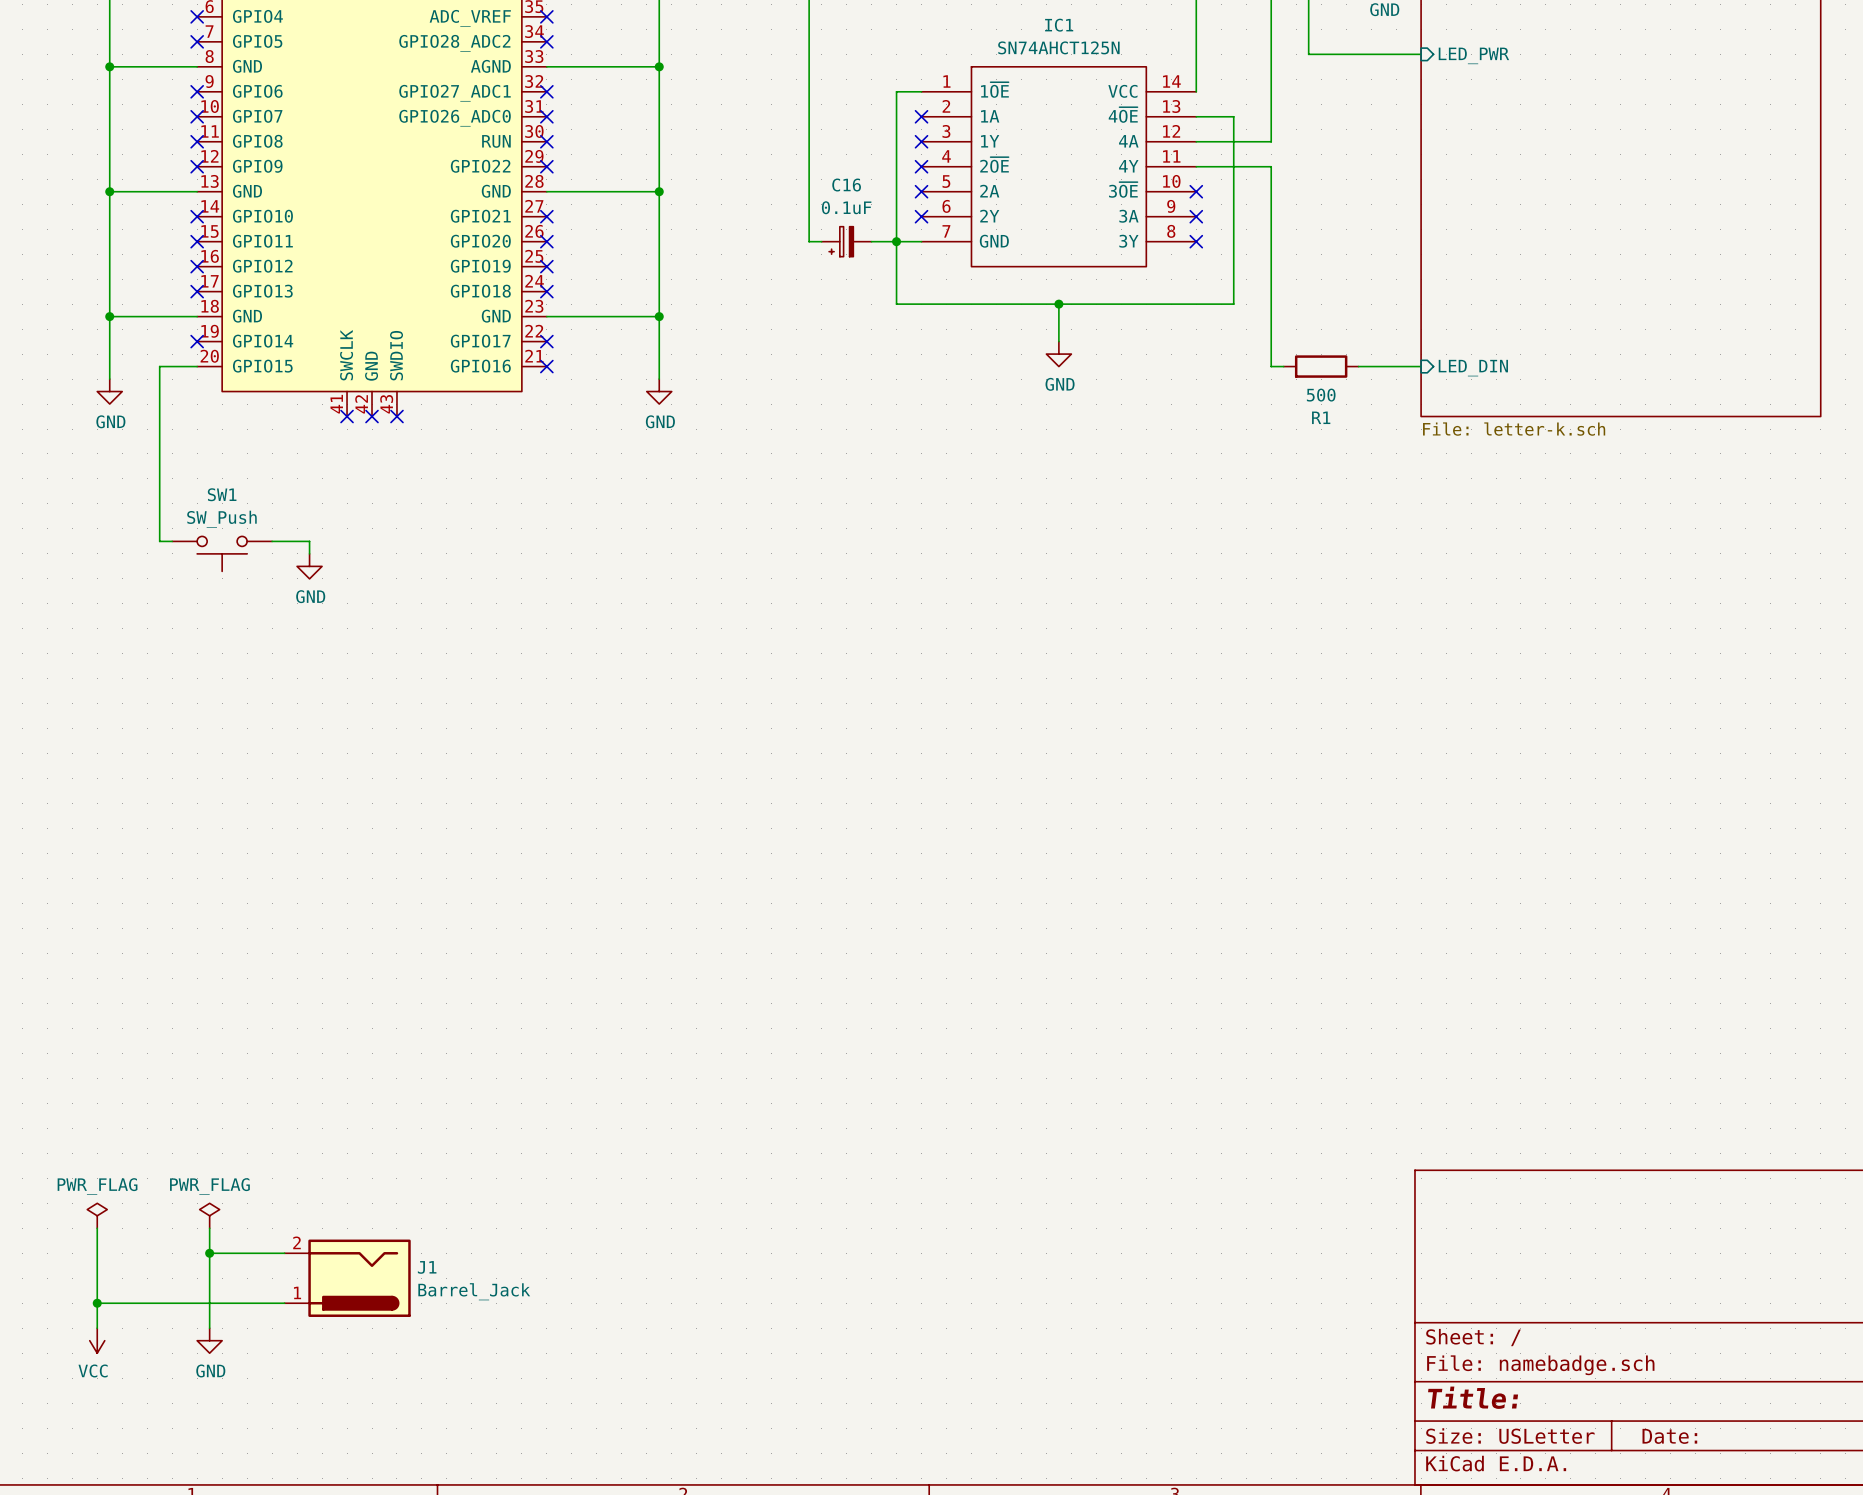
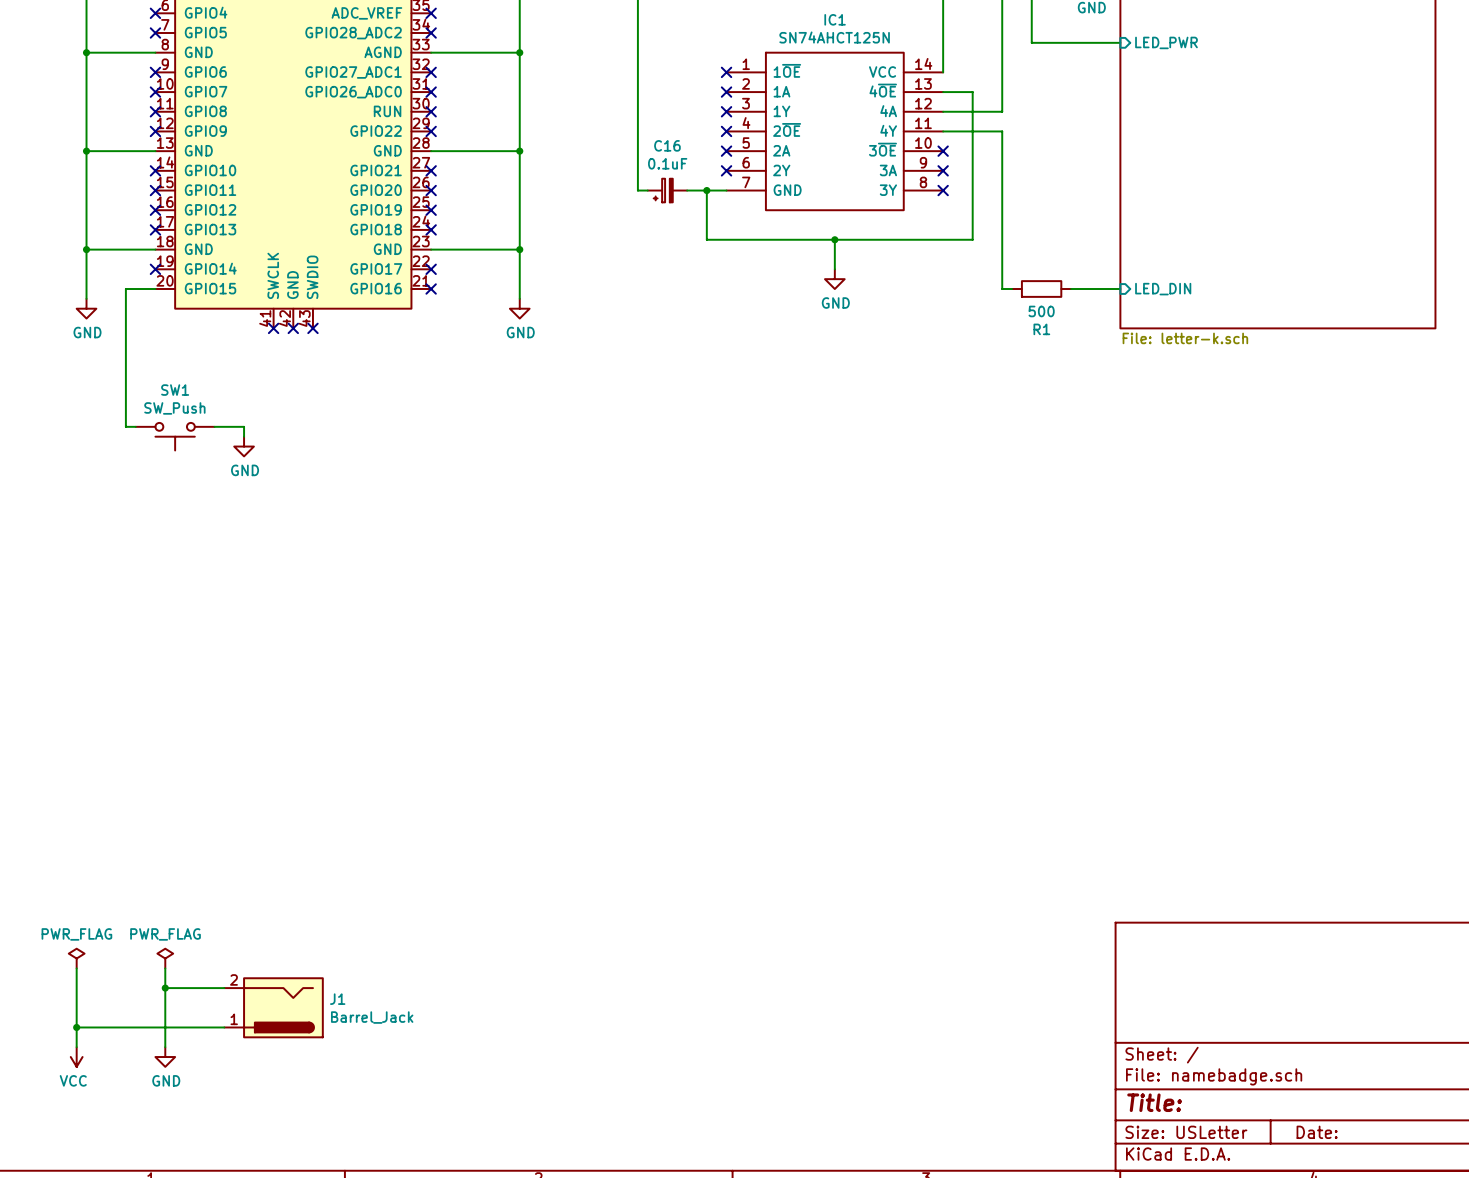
wire: (921, 91) (896, 91) (896, 241) -> none
no-connect mark: none -> (726, 72)

